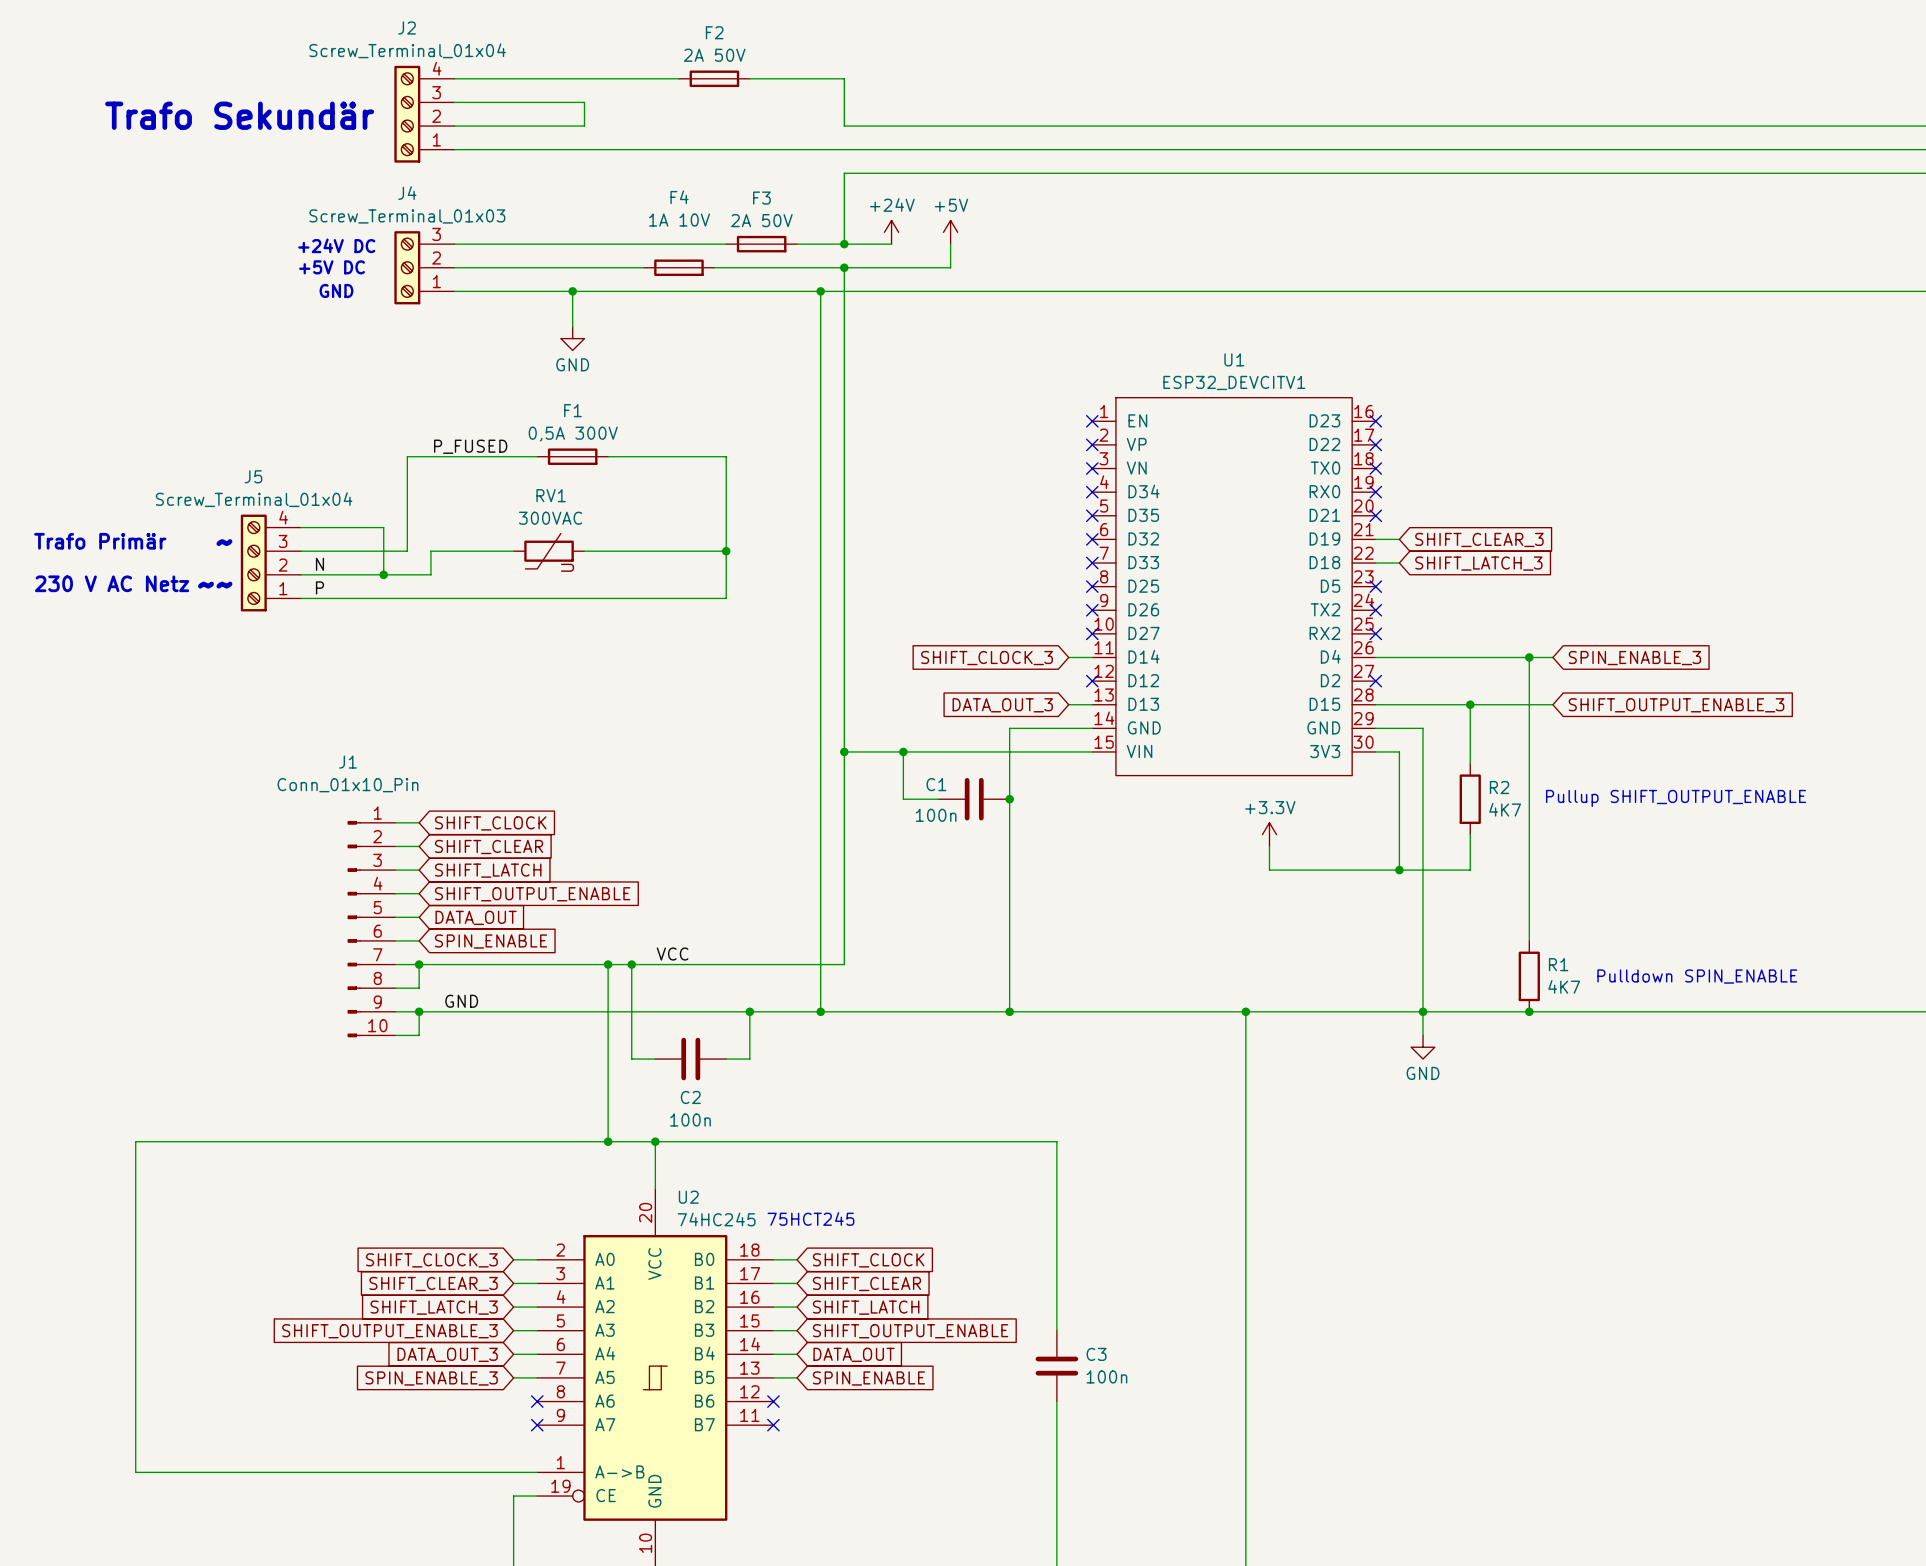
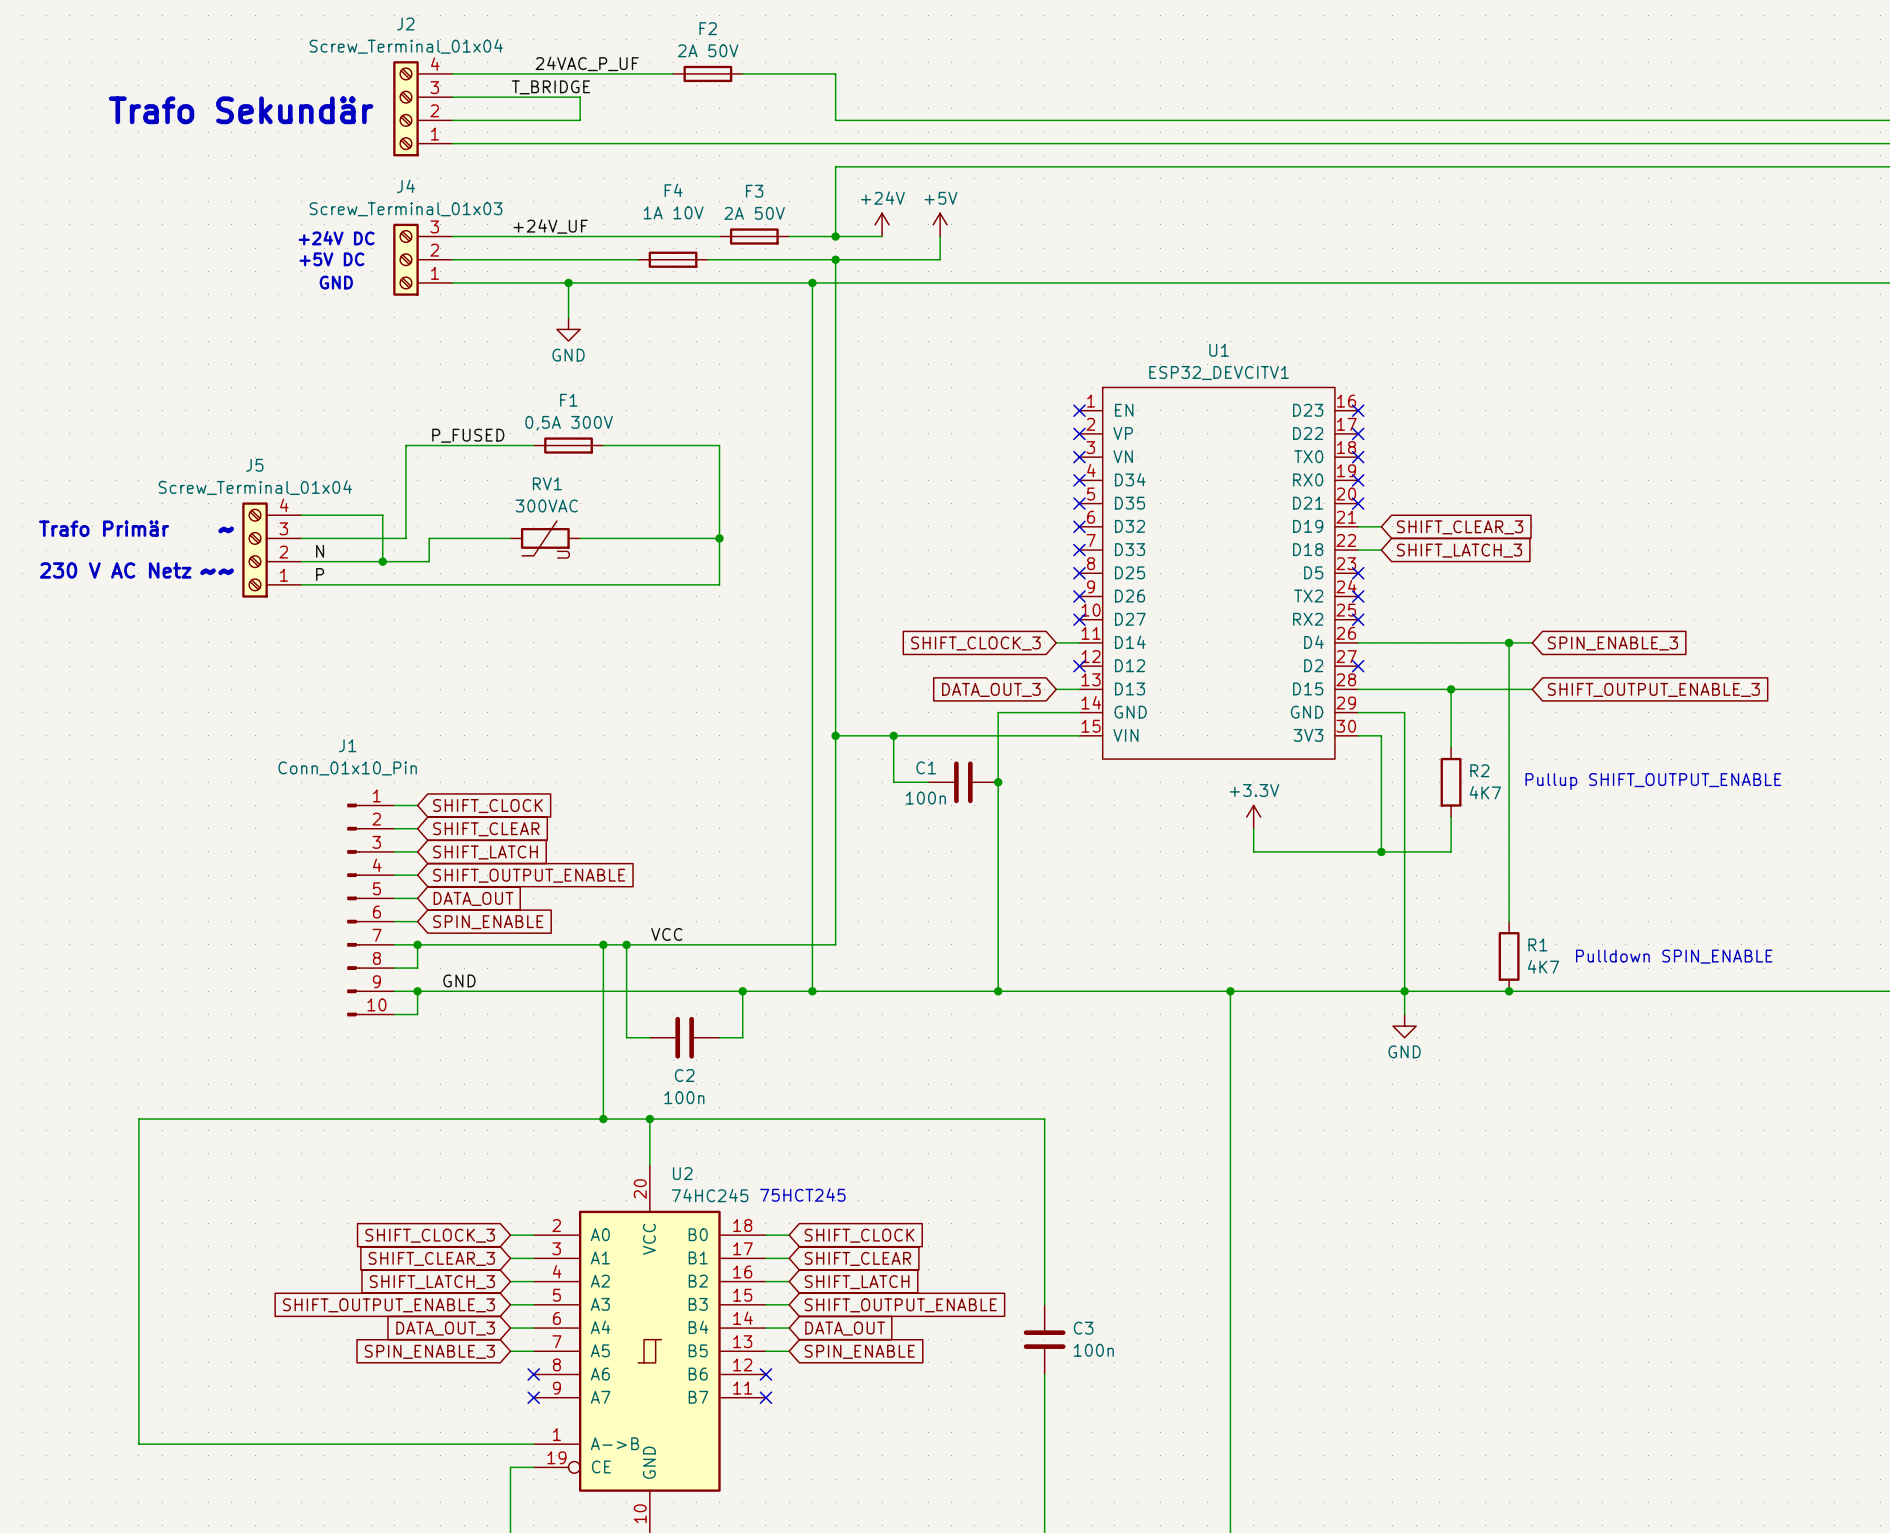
label: none -> 24VAC_P_UF (587, 63)
label: none -> T_BRIDGE (550, 87)
label: none -> +24V_UF (550, 226)

